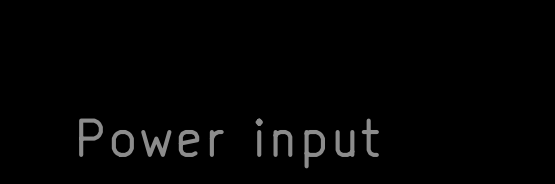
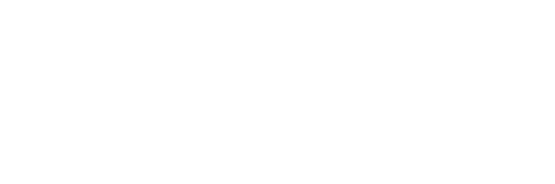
text: Power input (229, 143) -> none

